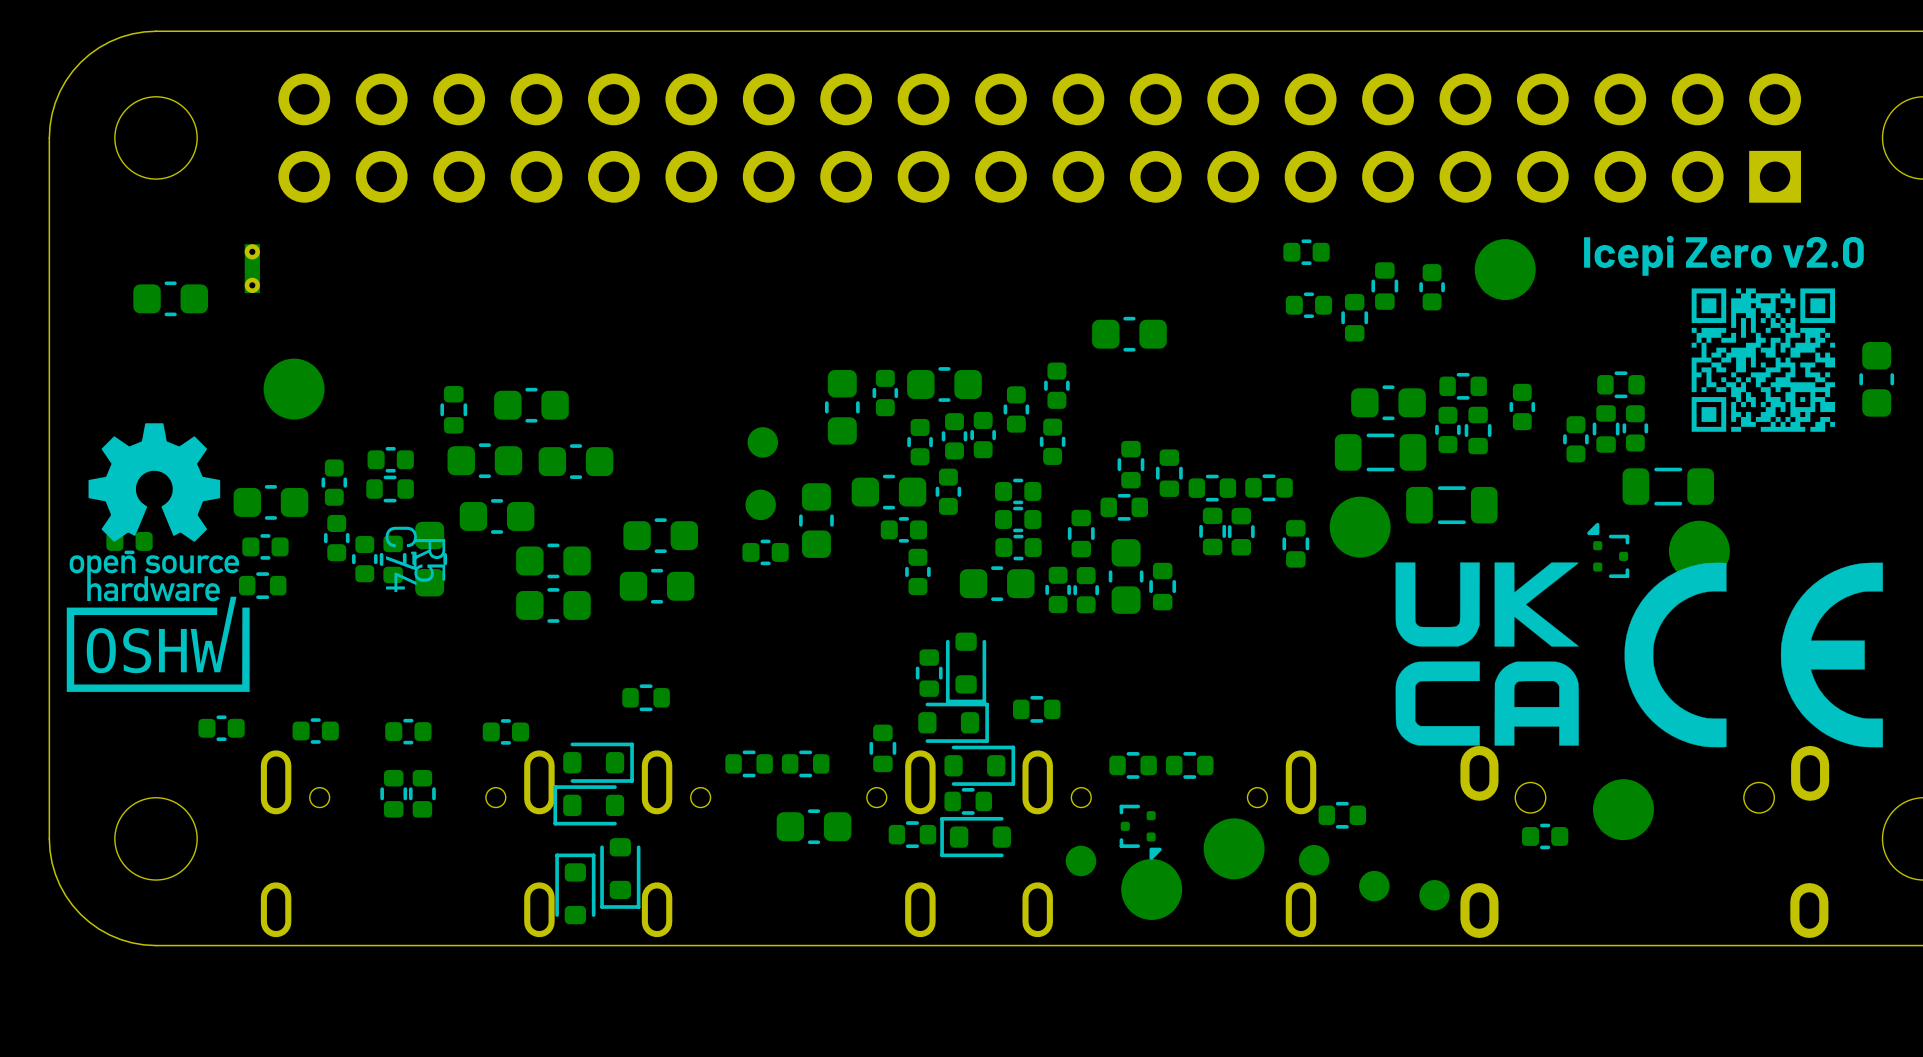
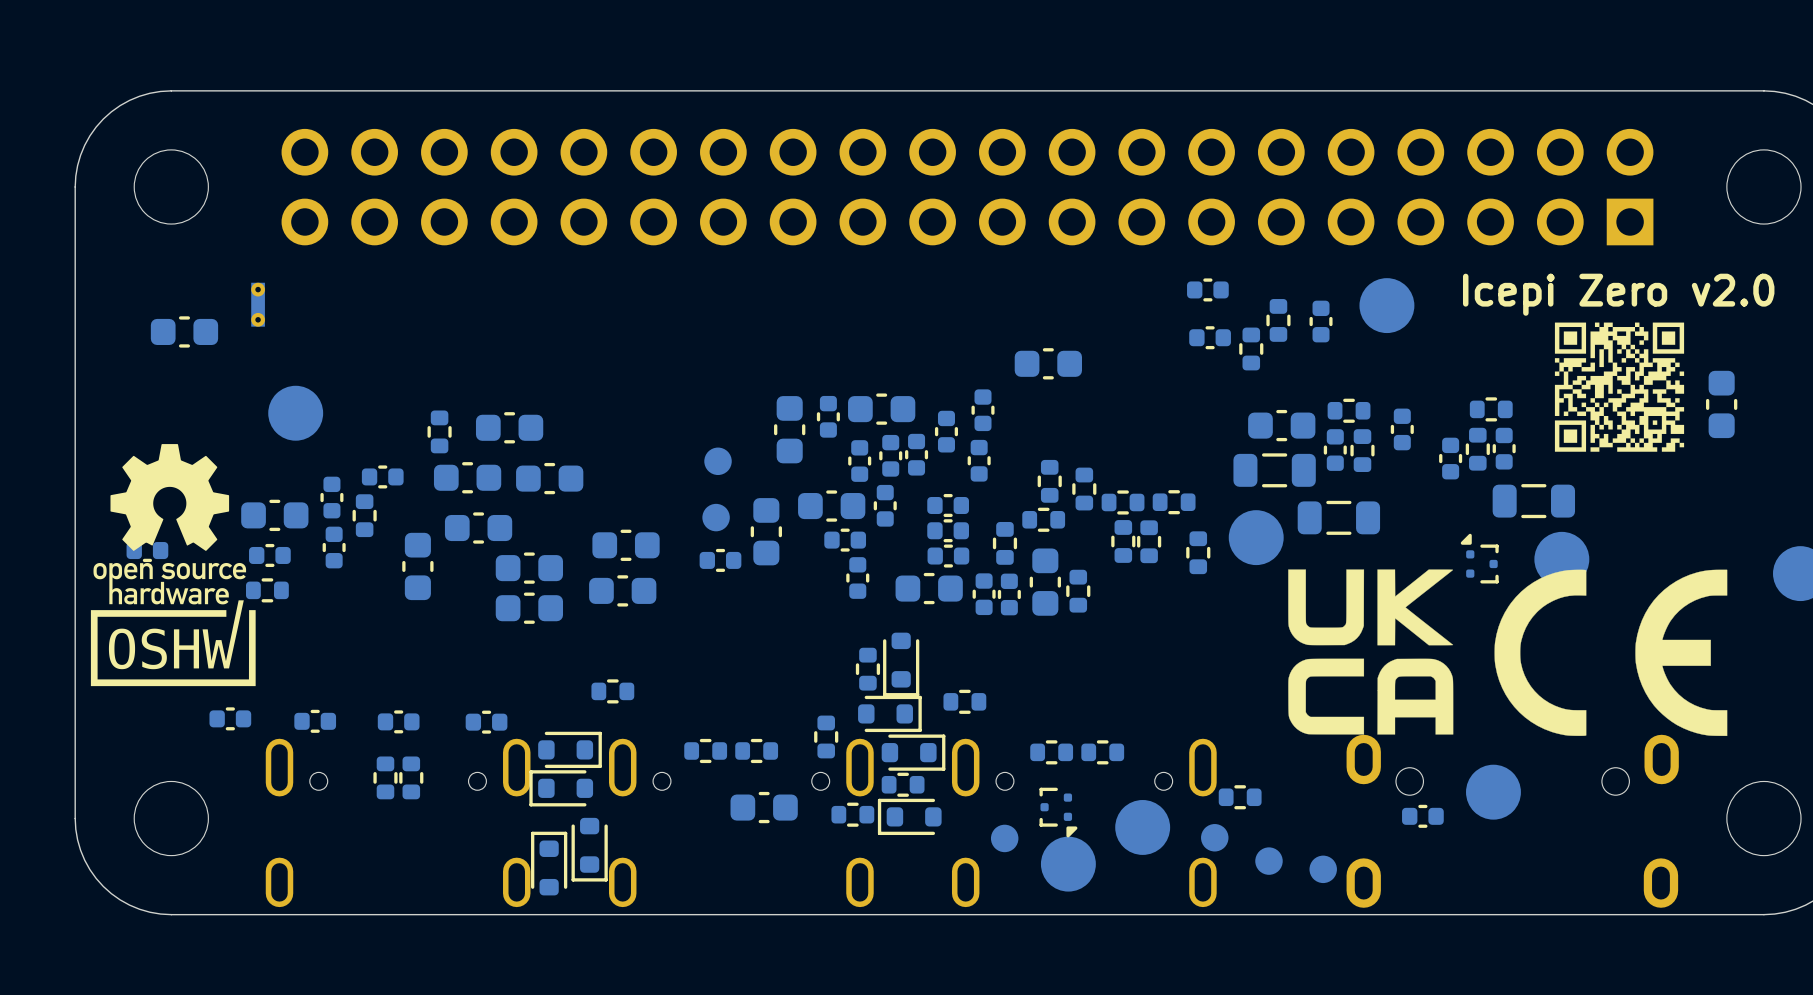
part rotation: 0° (390, 489) -> 90° clockwise (364, 515)
C74: (364, 559) -> none
R5: (393, 559) -> none

